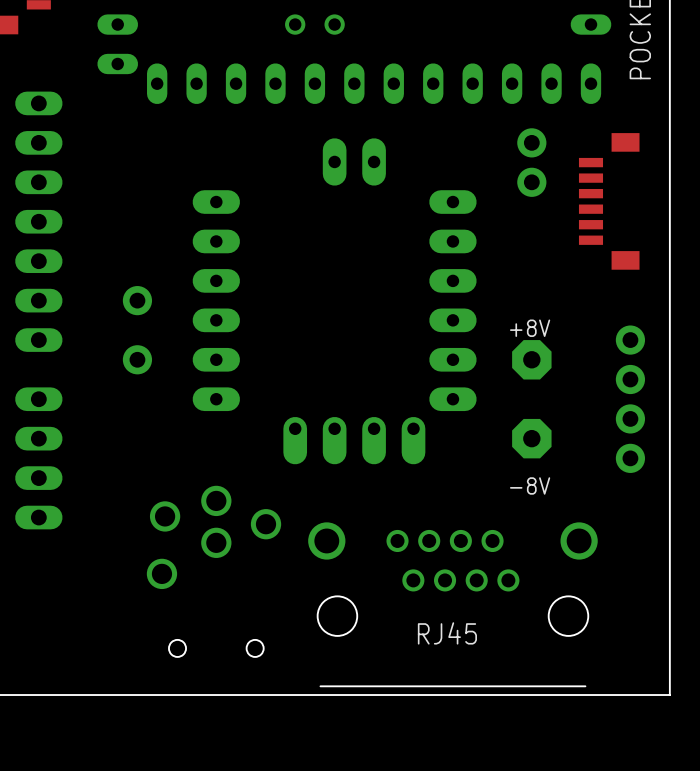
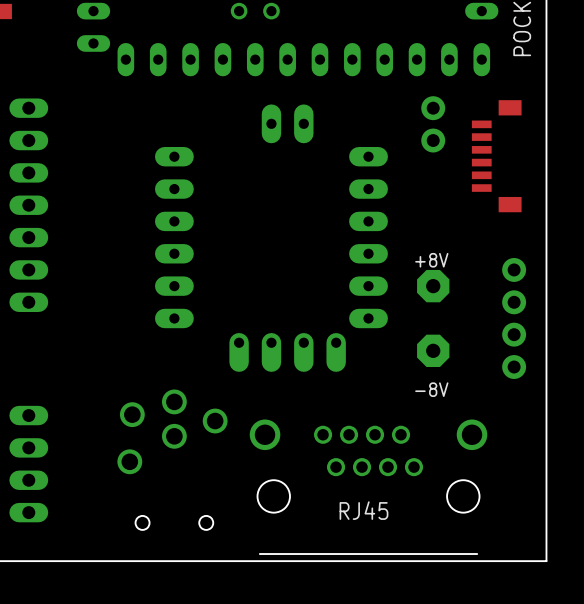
part position: (38, 221) -> (28, 205)
part: (137, 300) -> none
part: (137, 359) -> none
part position: (38, 458) -> (28, 464)

